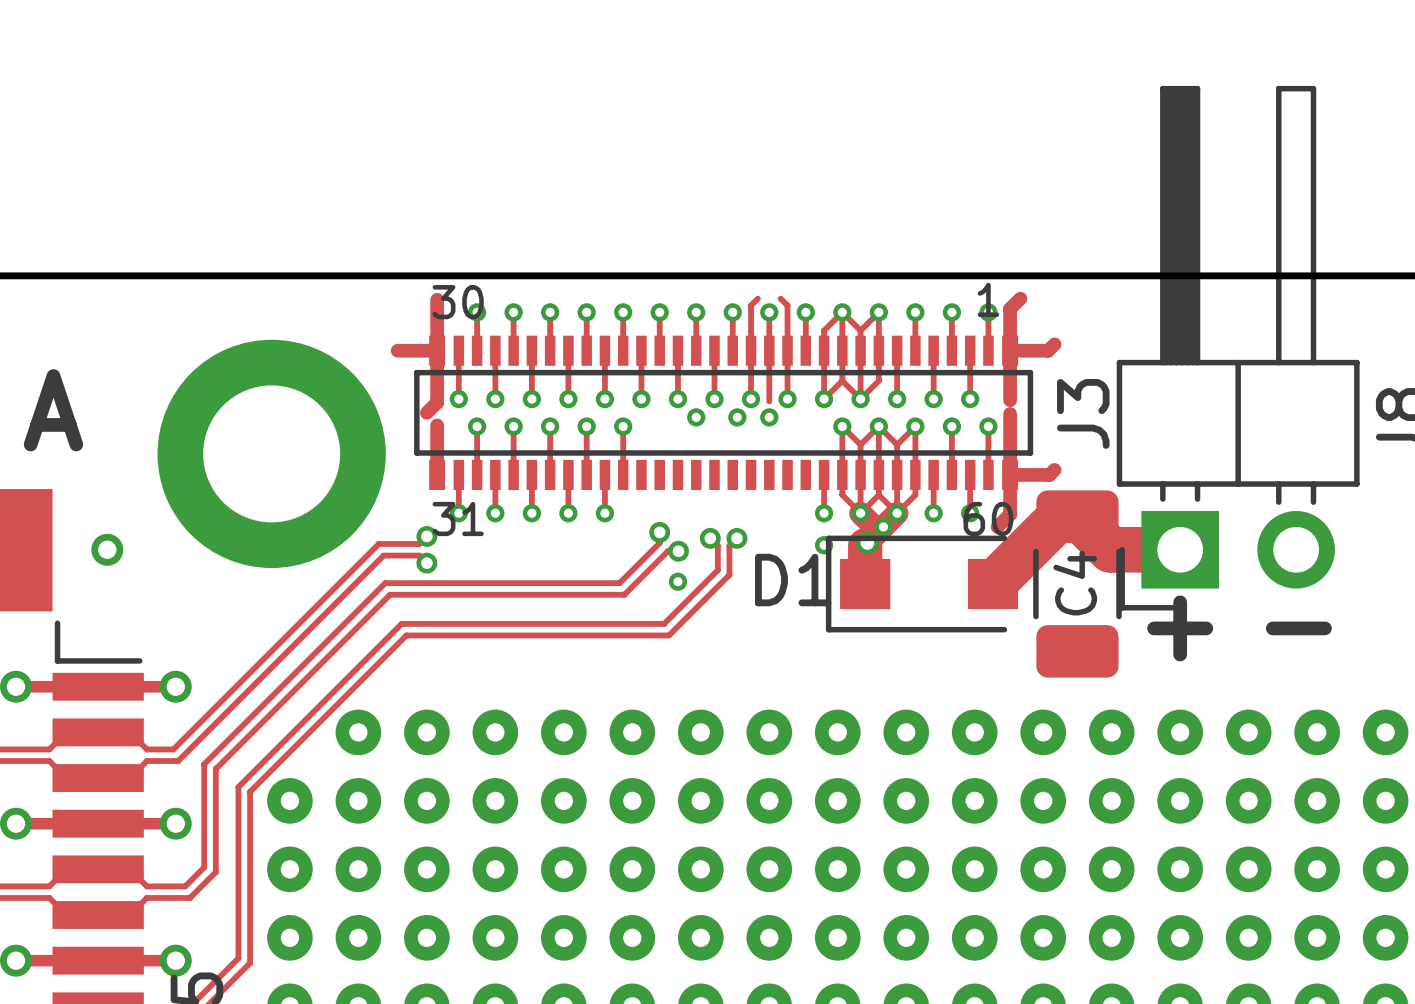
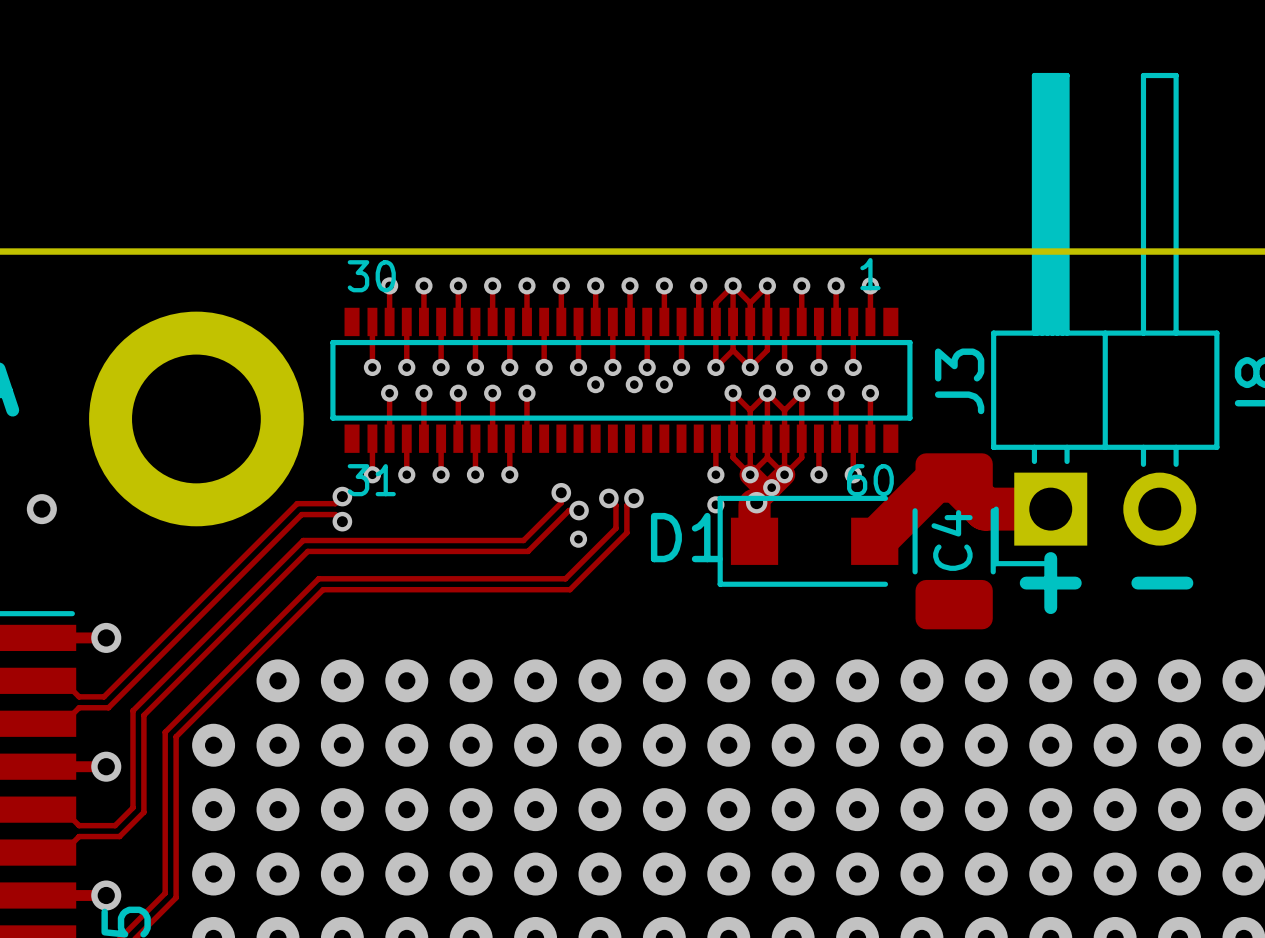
track: (757, 298) (751, 305) (751, 350) -> none
track: (780, 298) (787, 305) (787, 350) -> none
track: (1020, 298) (1010, 308) (1010, 400) -> none
track: (437, 299) (437, 402) (426, 412) -> none
track: (1054, 344) (1048, 350) (1010, 350) -> none
track: (397, 350) (437, 350) -> none
track: (769, 350) (769, 401) -> none
track: (1010, 413) (1010, 514) (997, 526) -> none
track: (437, 425) (437, 474) -> none
track: (1054, 469) (1049, 474) (1010, 474) -> none

